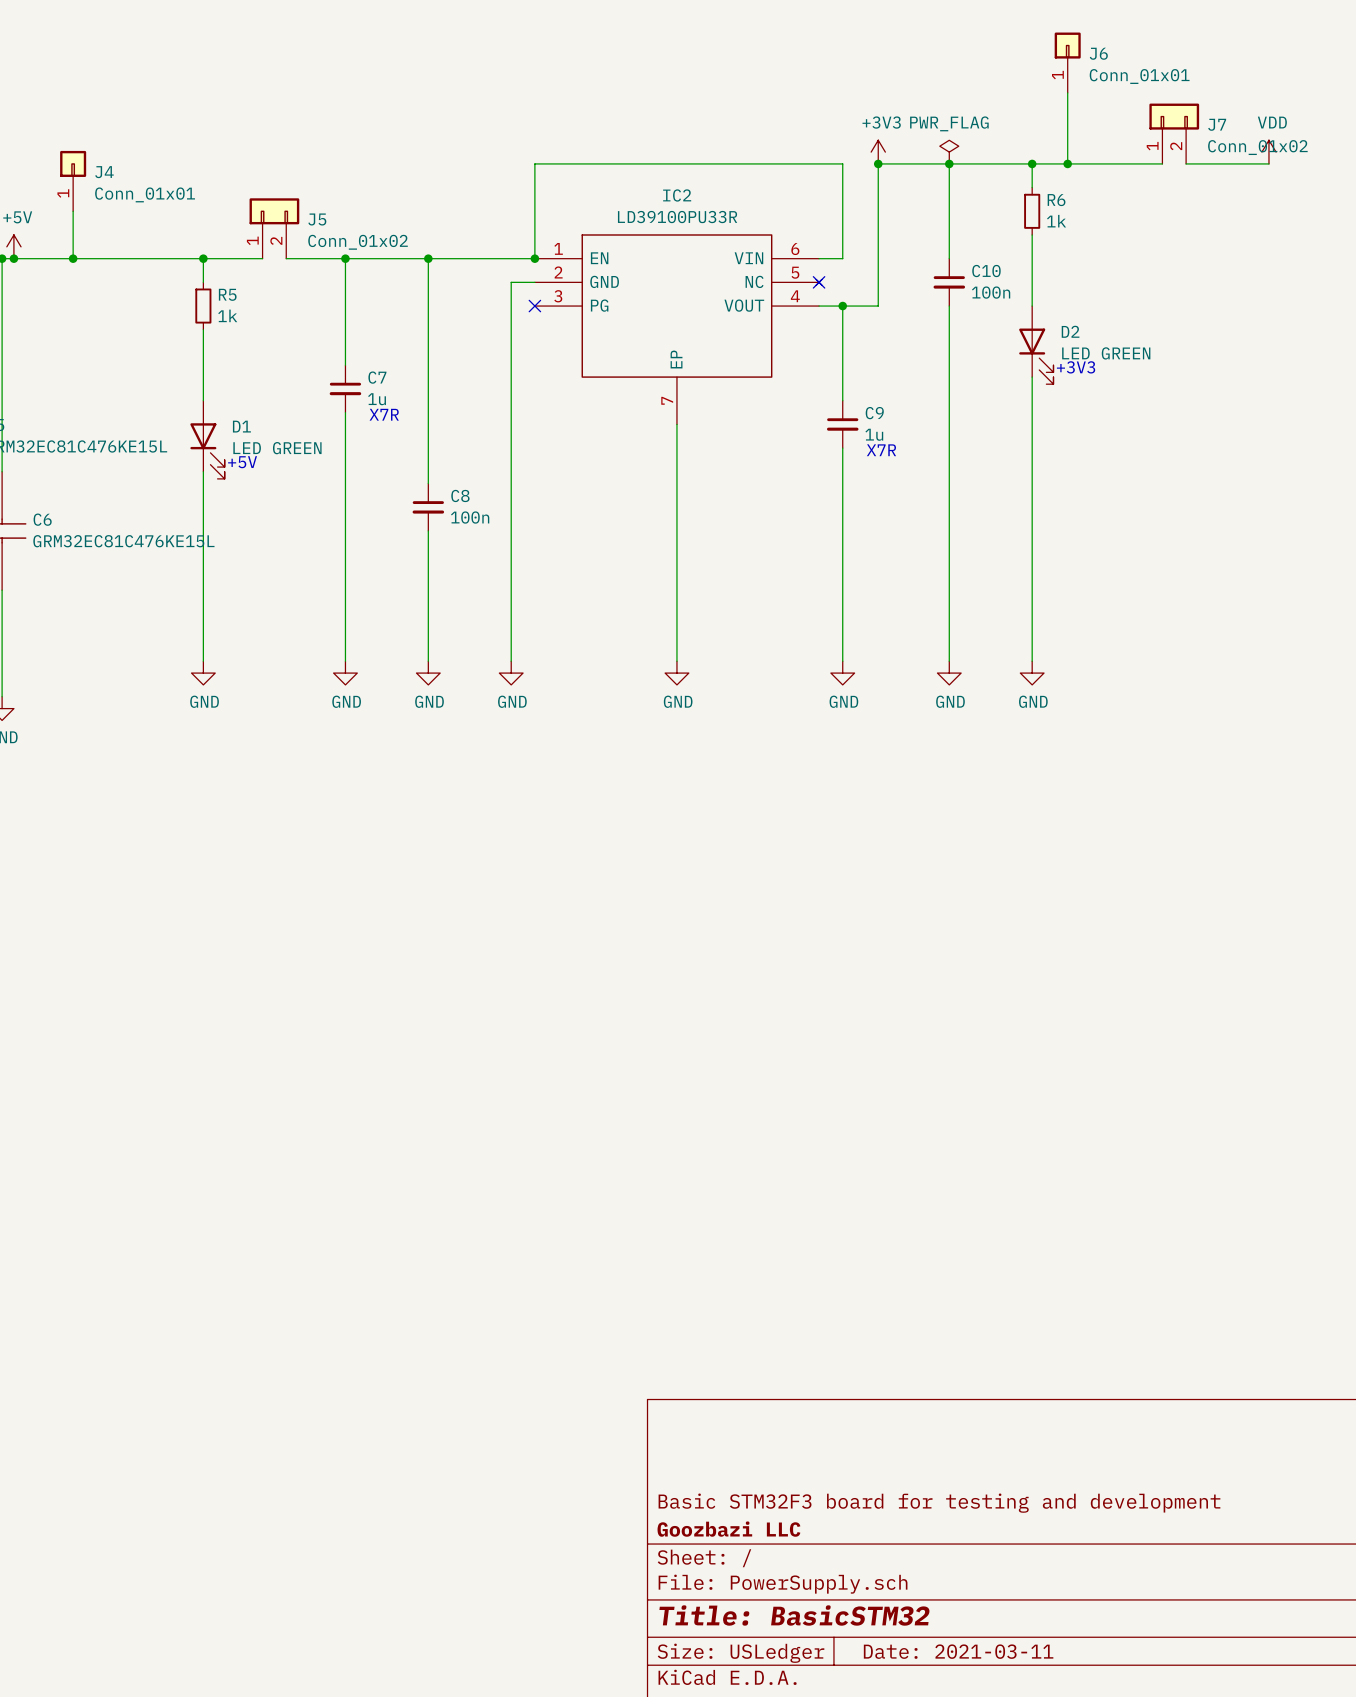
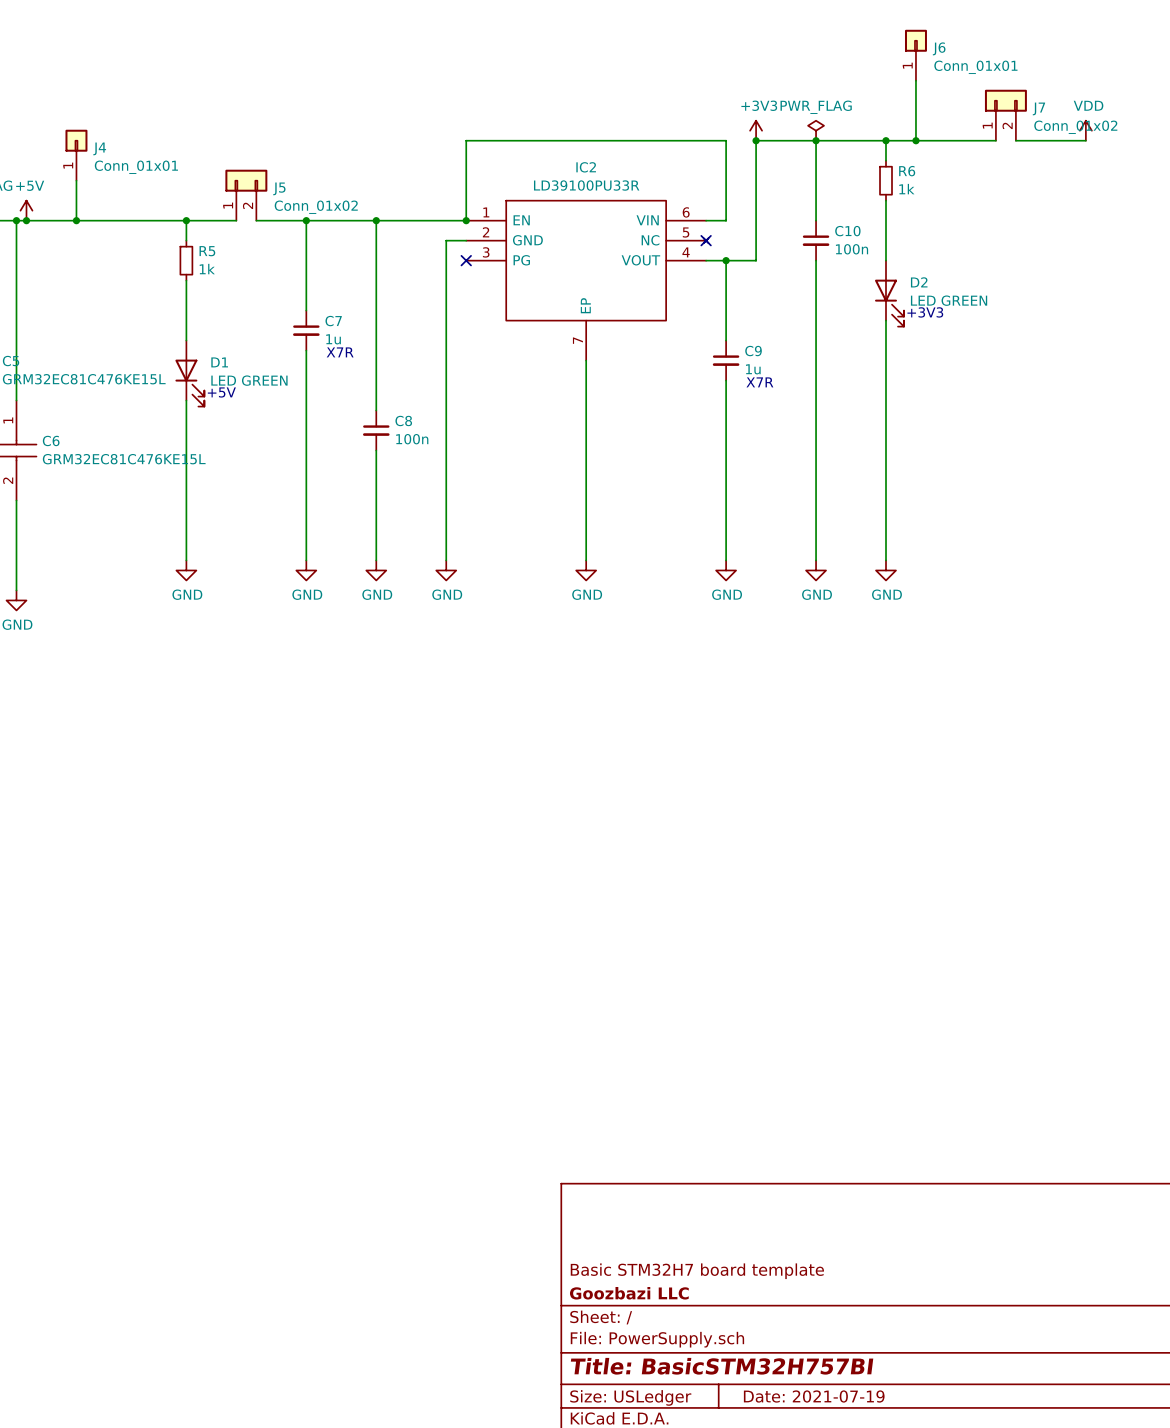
title block: Basic STM32F3 board for testing and development (939, 1503) -> Basic STM32H7 board template (697, 1271)
title block: Title: BasicSTM32 (794, 1615) -> Title: BasicSTM32H757BI (722, 1366)
title block: Date: 2021-03-11 (958, 1651) -> Date: 2021-07-19 (814, 1396)

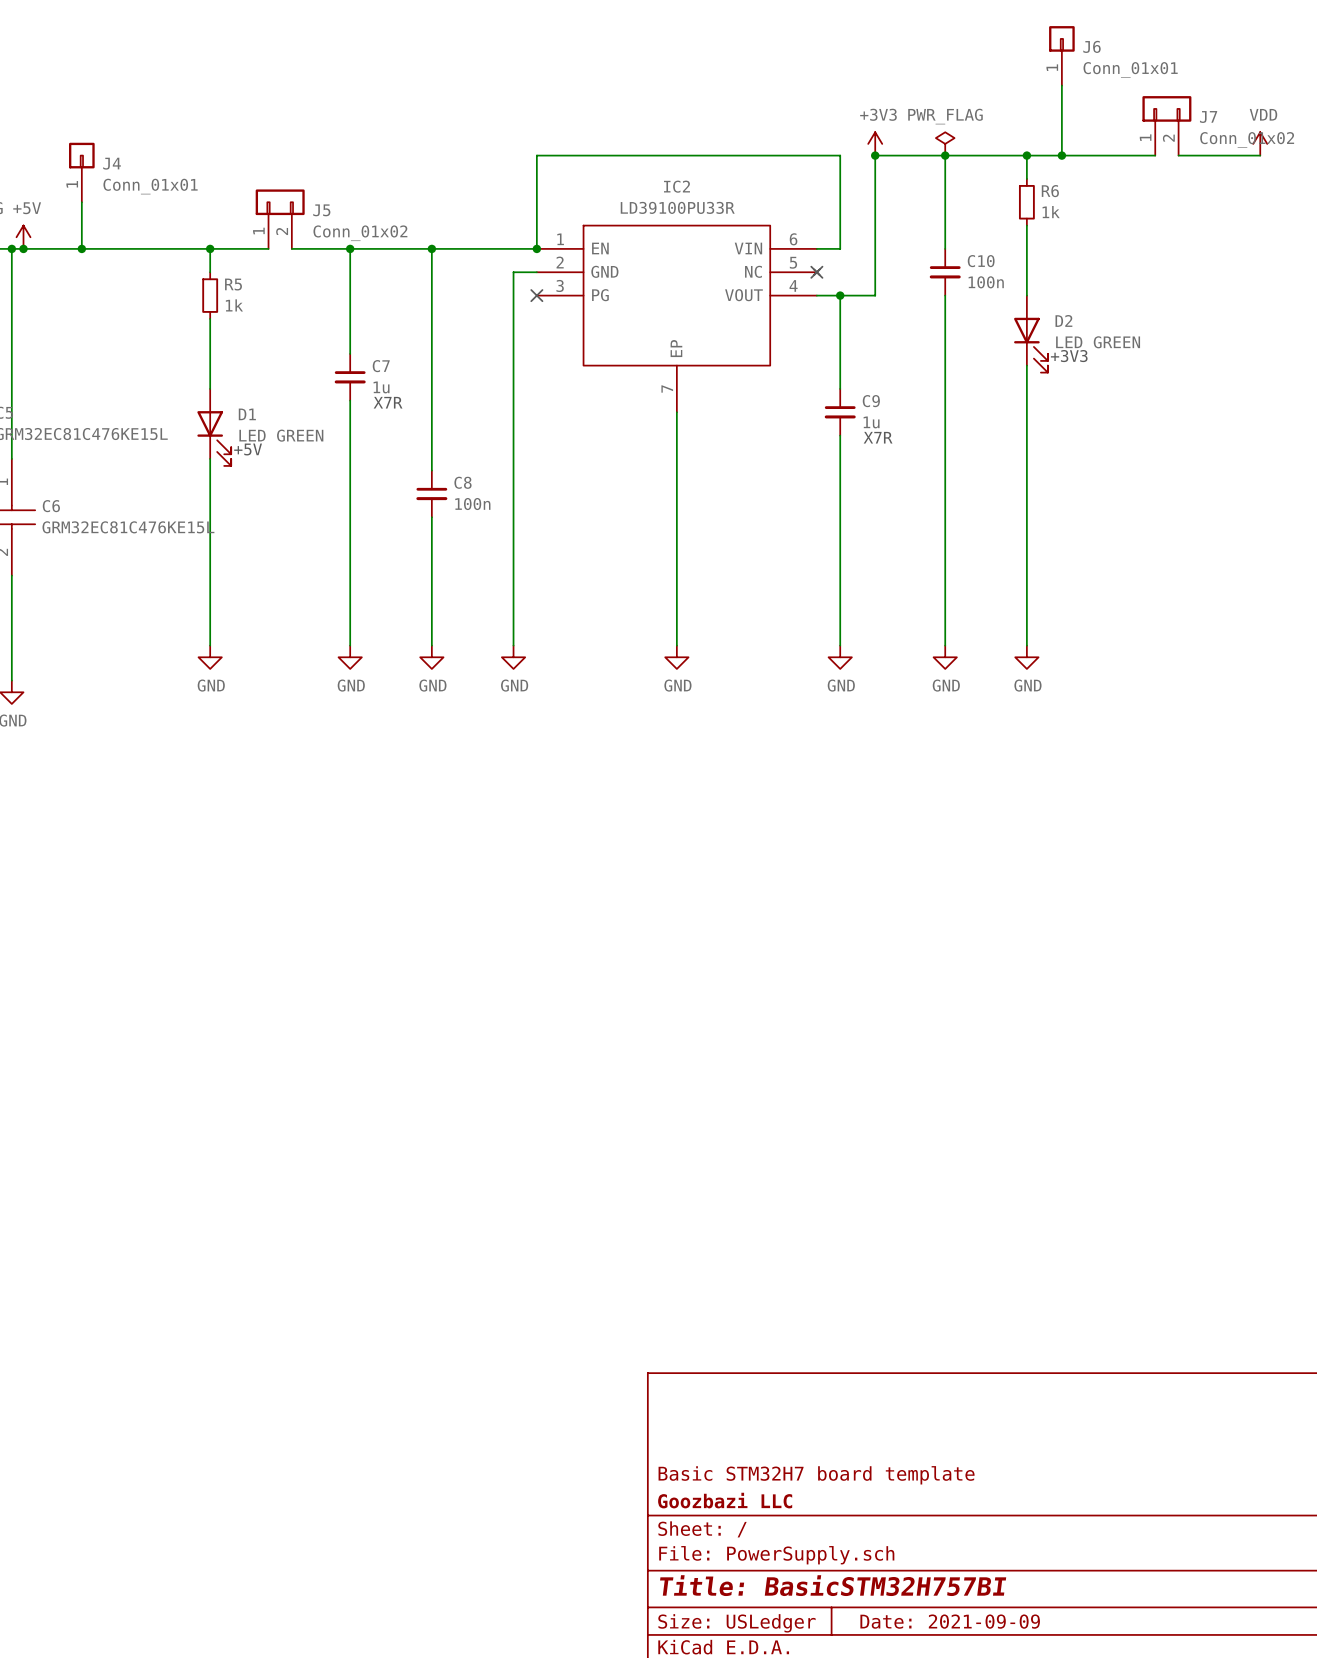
title block: Date: 2021-07-19 (814, 1396) -> Date: 2021-09-09 (950, 1621)

